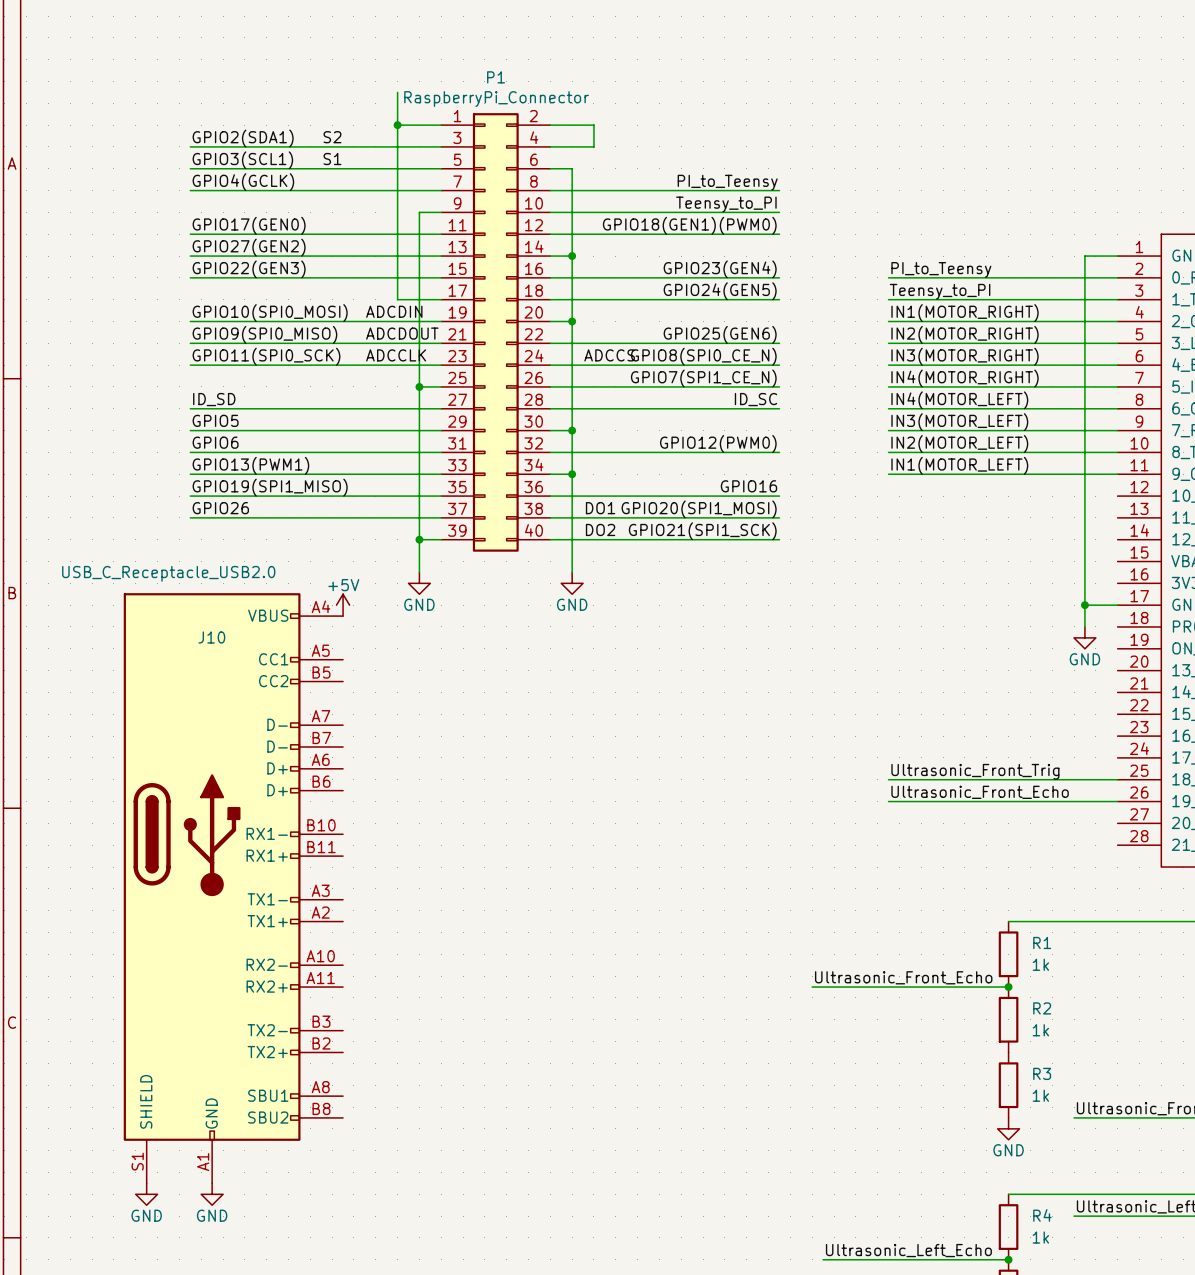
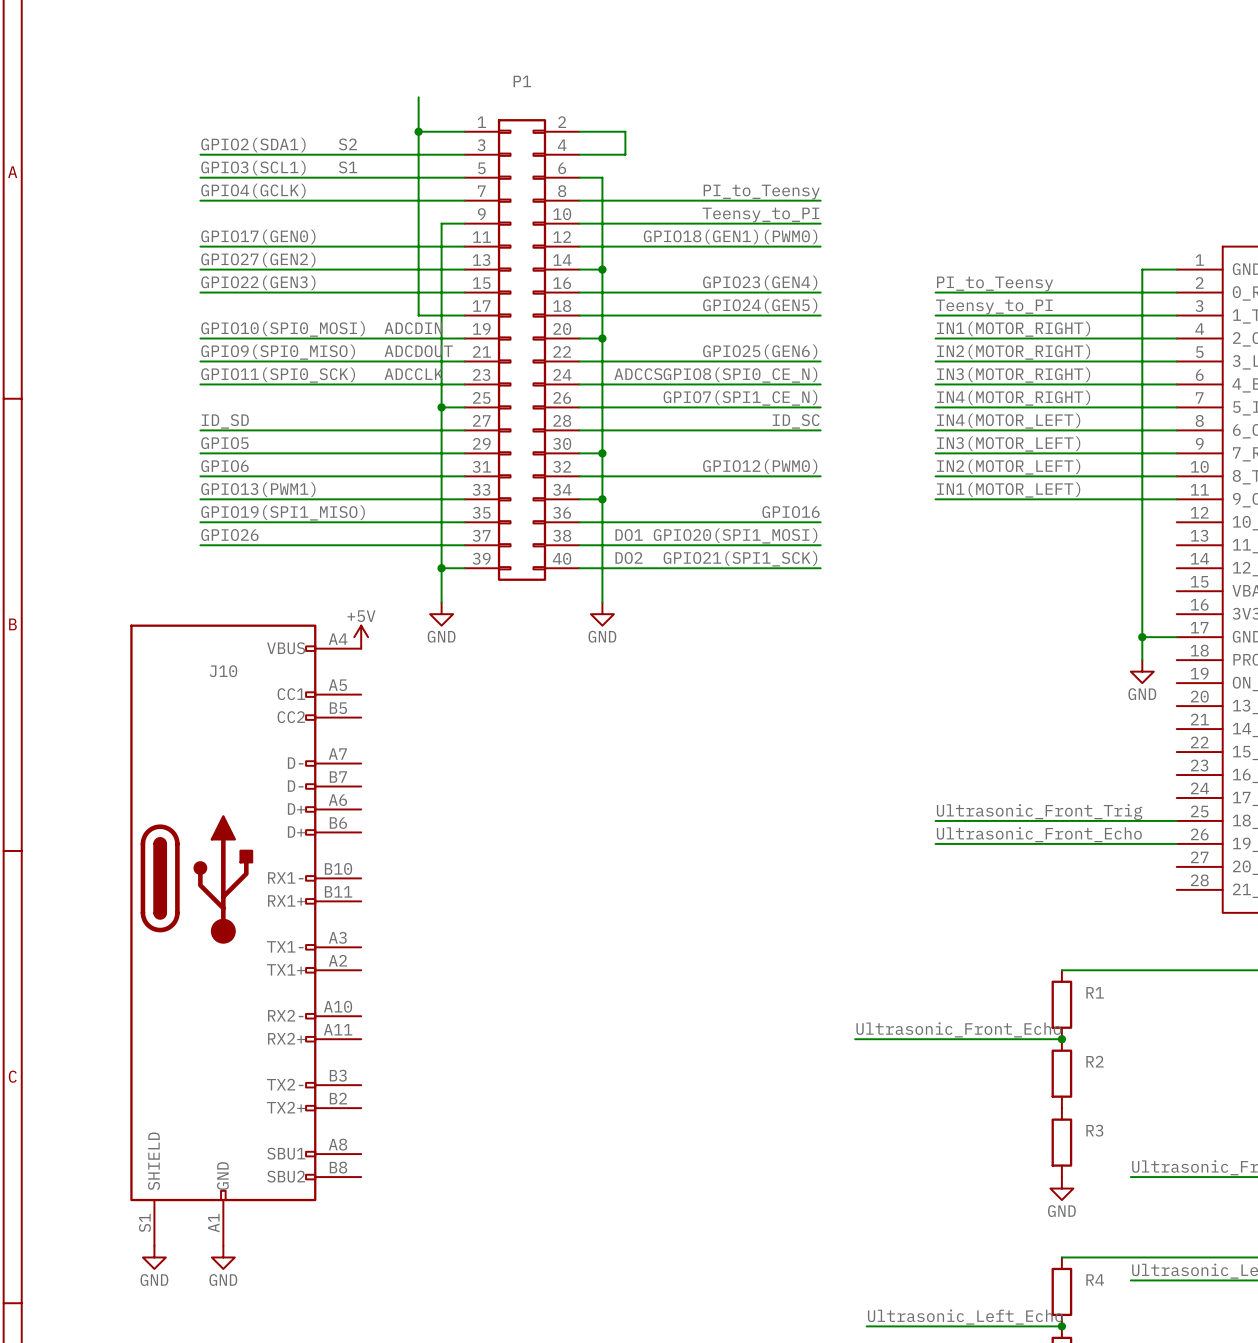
P1 value: RaspberryPi_Connector (496, 99) -> none
J10 value: USB_C_Receptacle_USB2.0 (168, 573) -> none
R1 value: 1k (1040, 964) -> none
R2 value: 1k (1040, 1030) -> none
R3 value: 1k (1040, 1095) -> none
R4 value: 1k (1040, 1237) -> none

